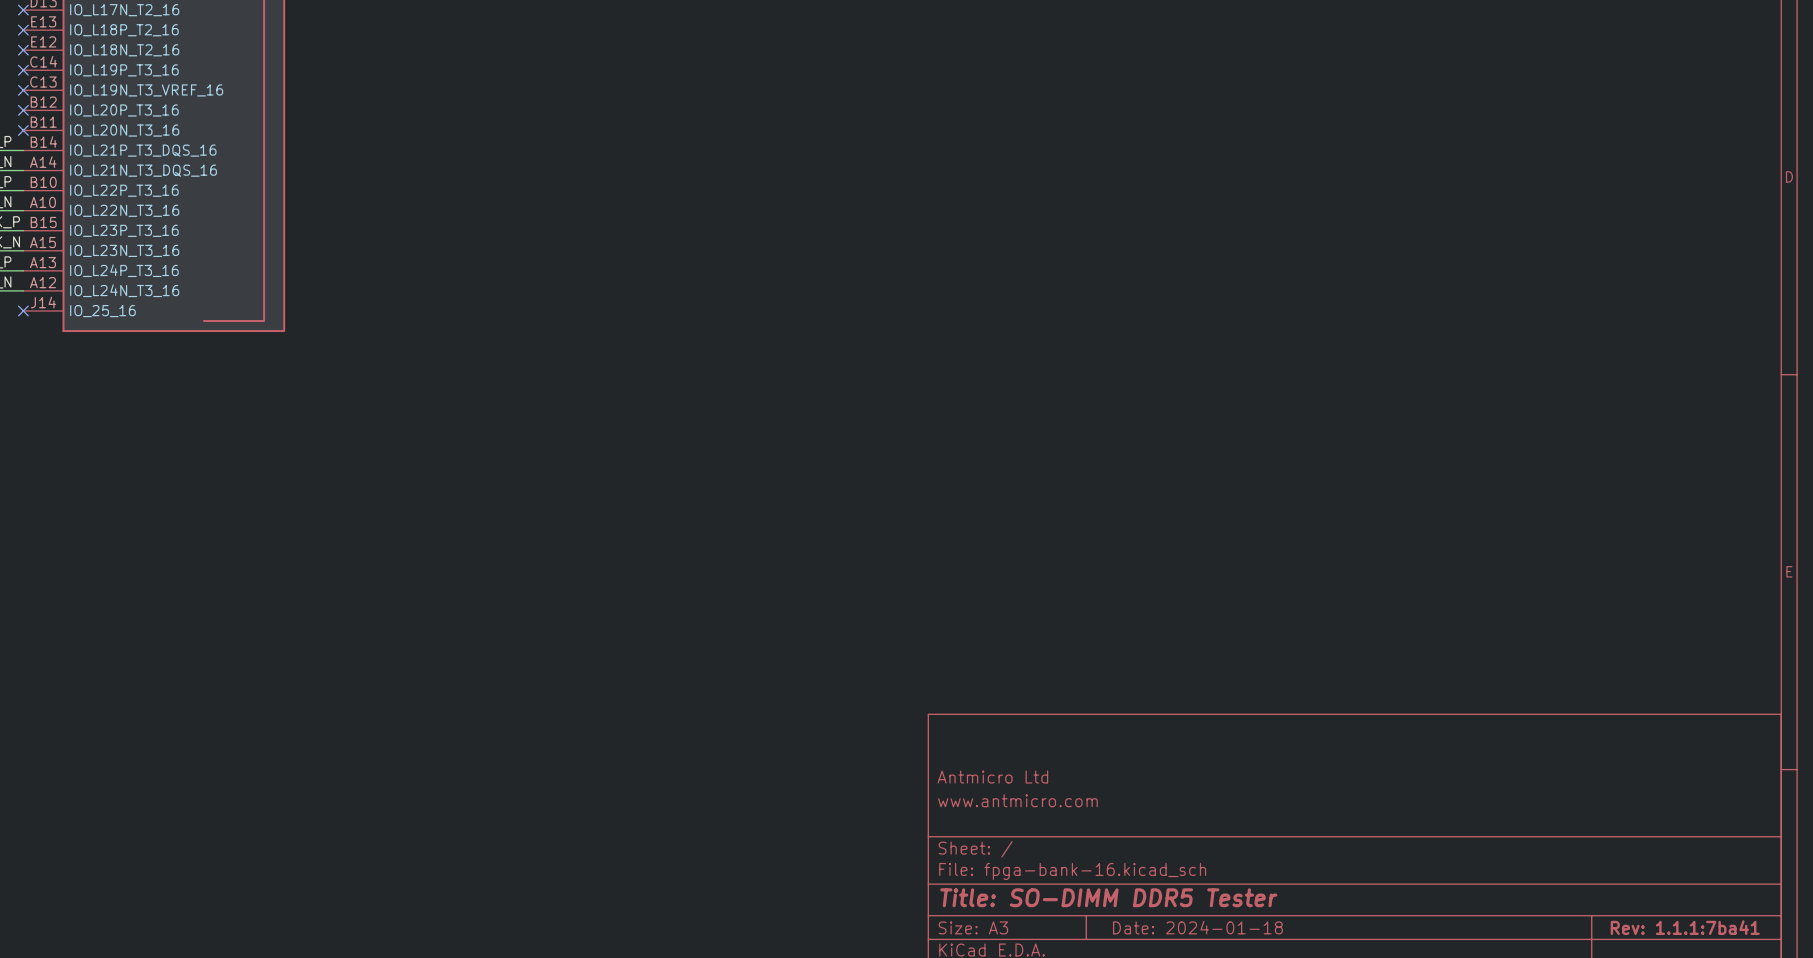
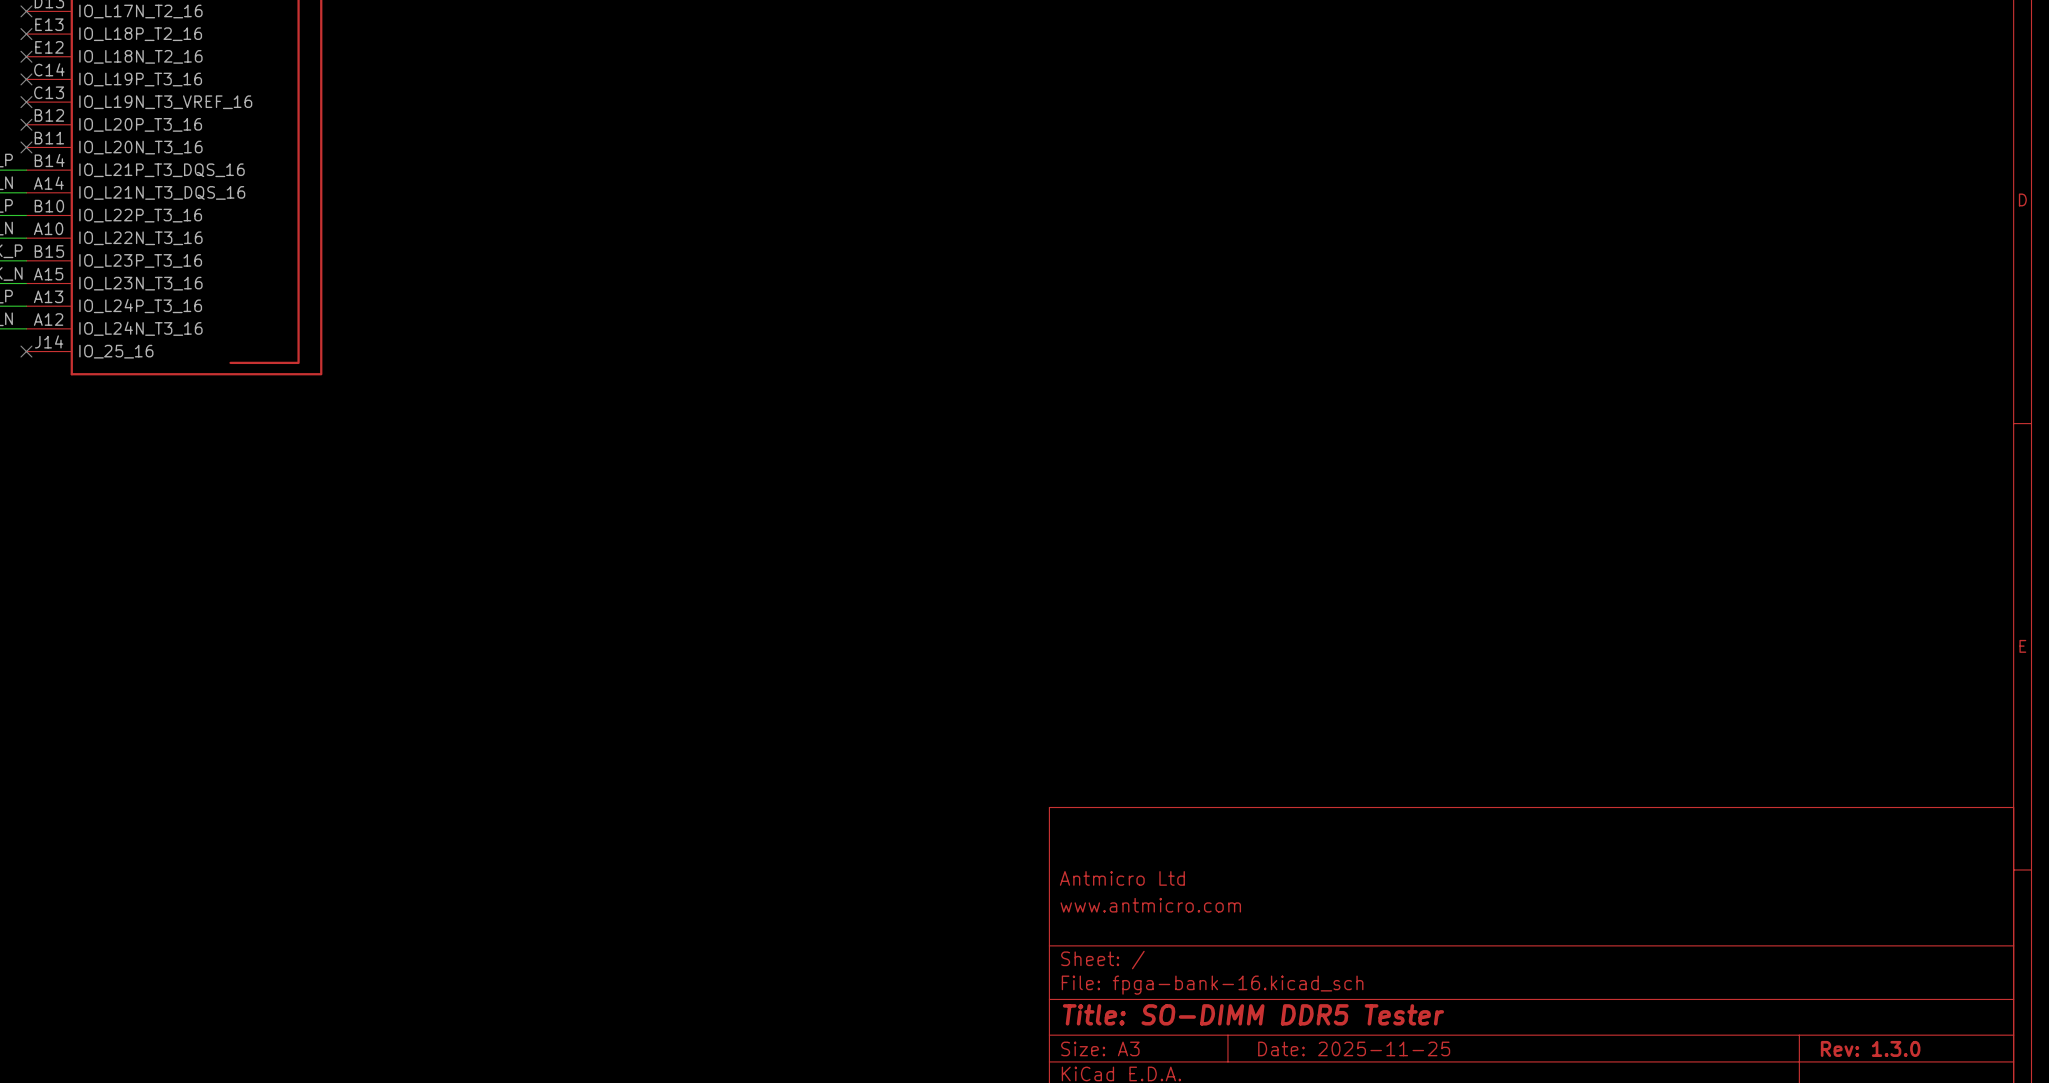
title block: Date: 2024-01-18 (1197, 927) -> Date: 2025-11-25 (1354, 1048)
title block: Rev: 1.1.1:7ba41 (1685, 927) -> Rev: 1.3.0 (1870, 1048)

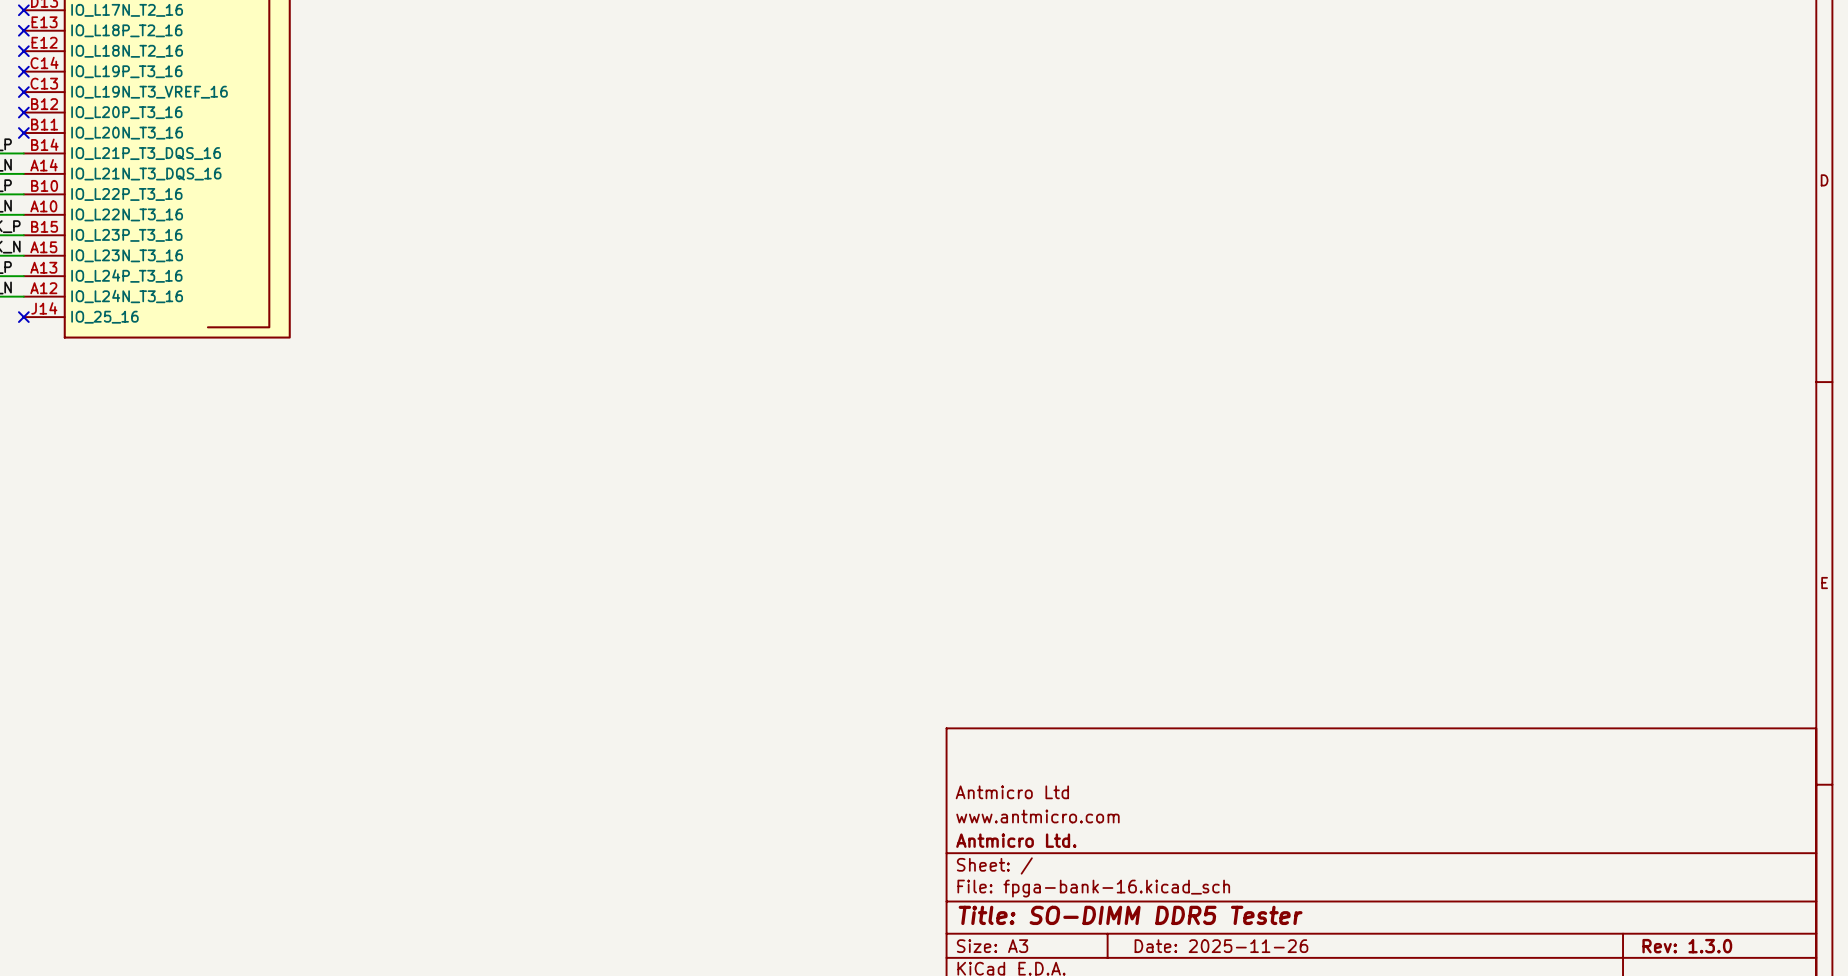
title block: none -> Antmicro Ltd. (1016, 840)
title block: Date: 2025-11-25 (1354, 1048) -> Date: 2025-11-26 (1221, 946)

